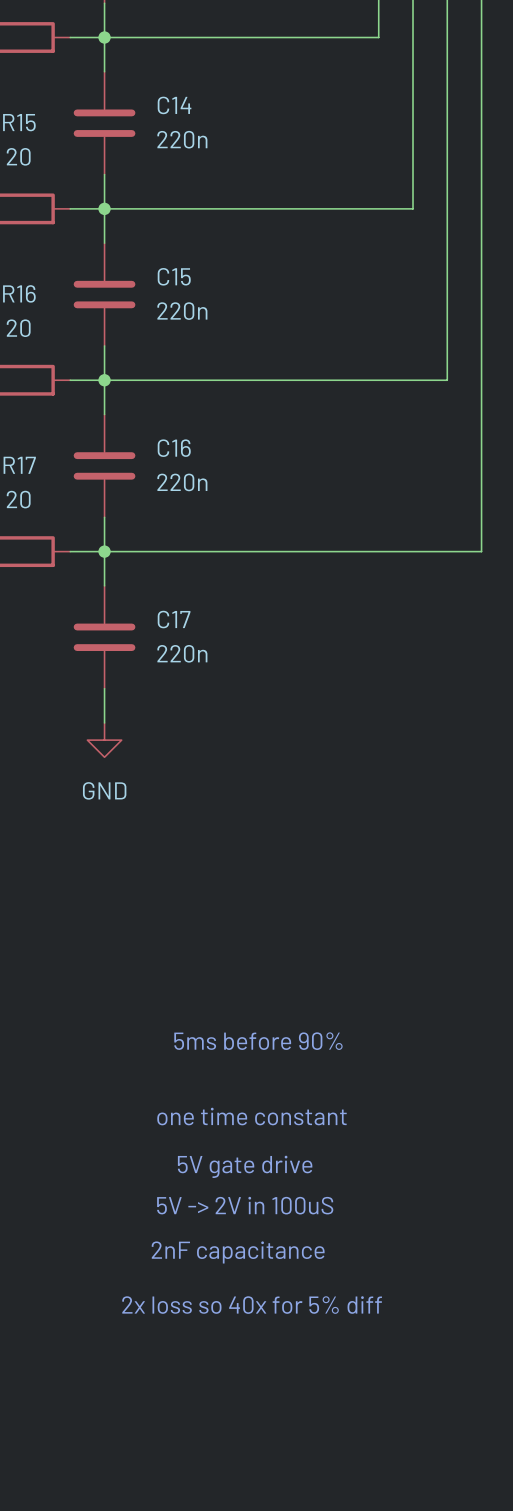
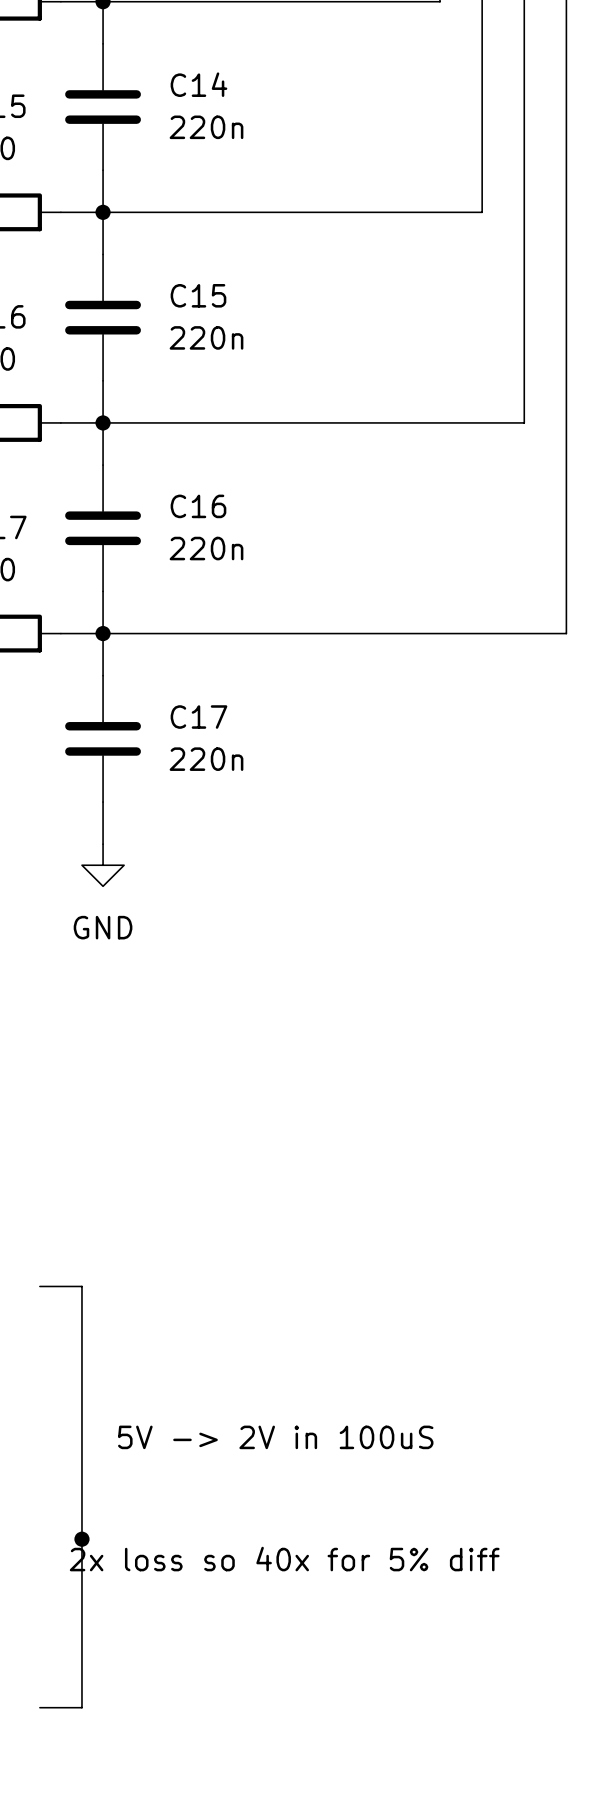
text: 5ms before 90% (258, 1041) -> none
wire: none -> (39, 1286) (81, 1286) (81, 1707) (39, 1707)
text: one time constant (251, 1116) -> none
text: 5V gate drive (245, 1166) -> none
text: 2nF capacitance (238, 1252) -> none
junction: none -> (81, 1539)

